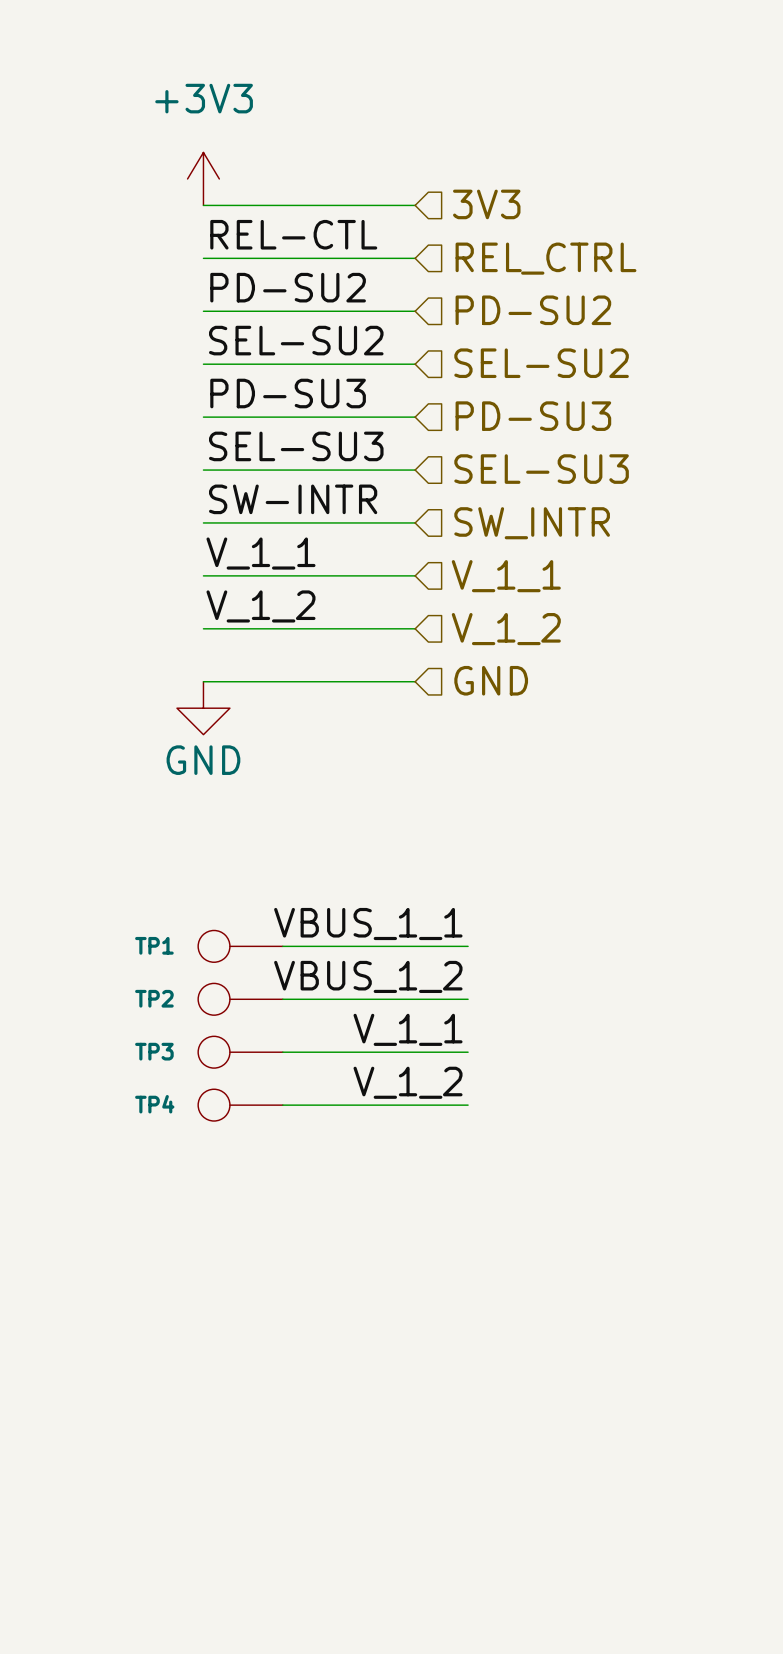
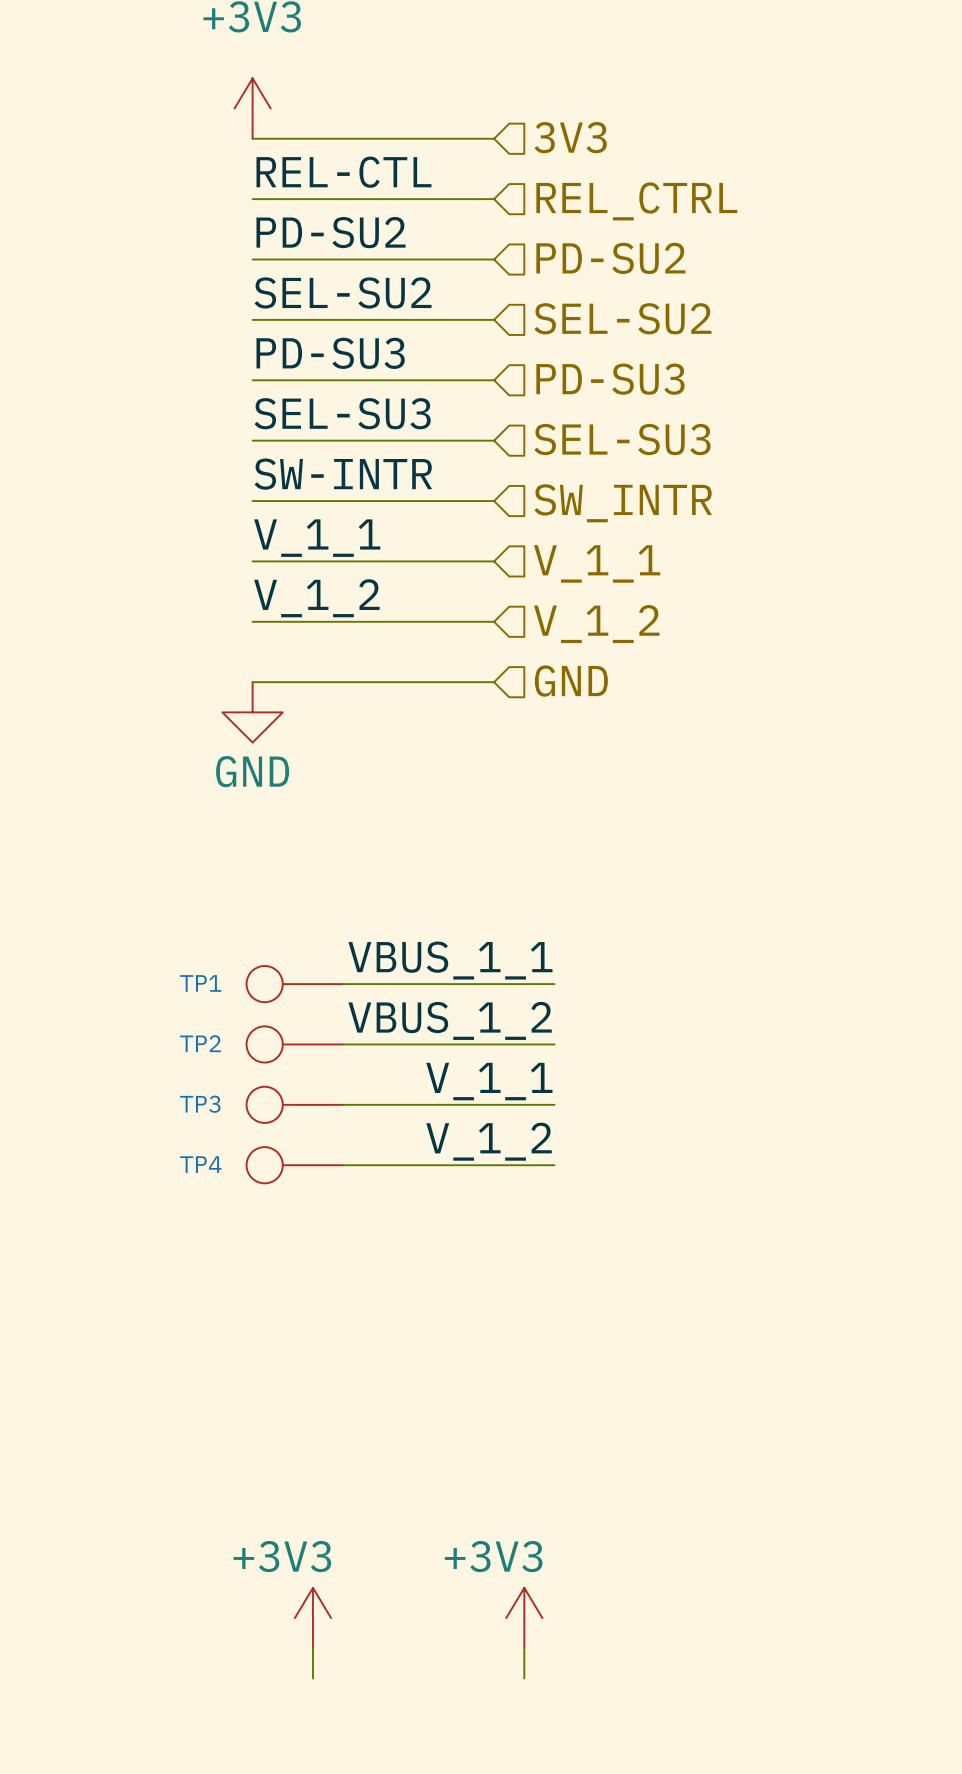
power symbol: none -> +3V3 (312, 1618)
power symbol: none -> +3V3 (524, 1618)
wire: none -> (312, 1648) (312, 1678)
wire: none -> (524, 1648) (524, 1678)

